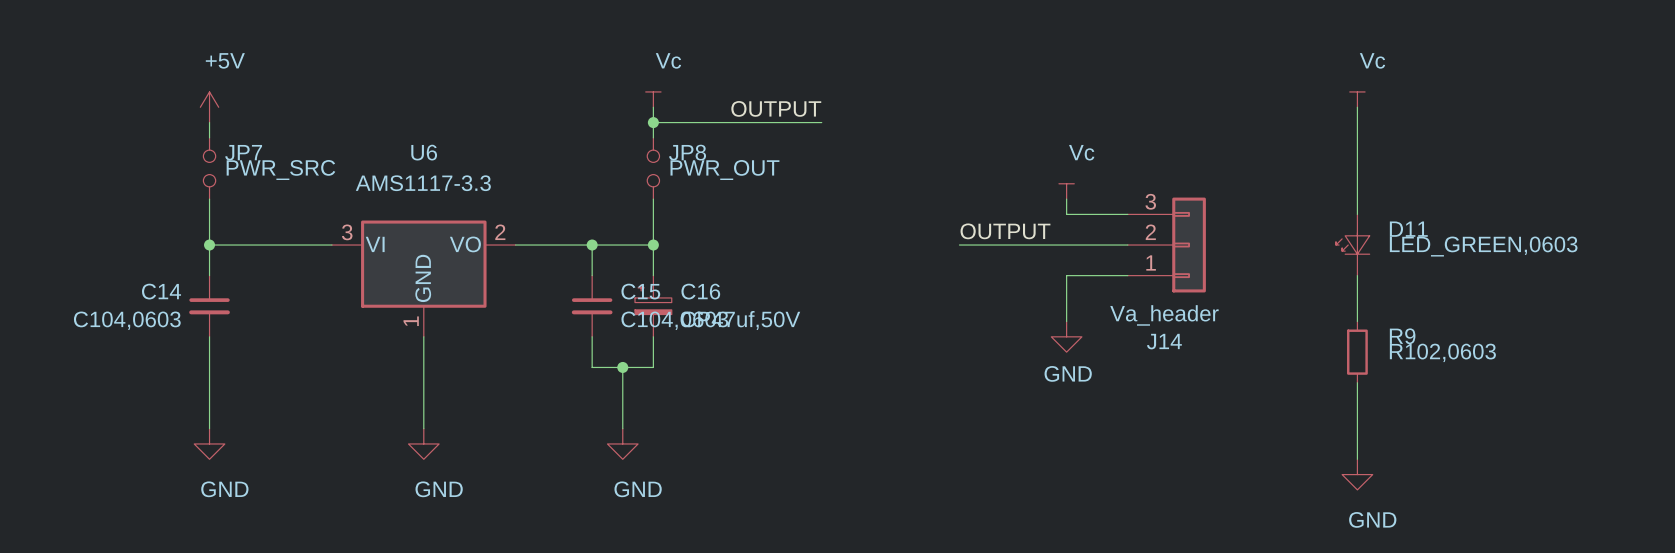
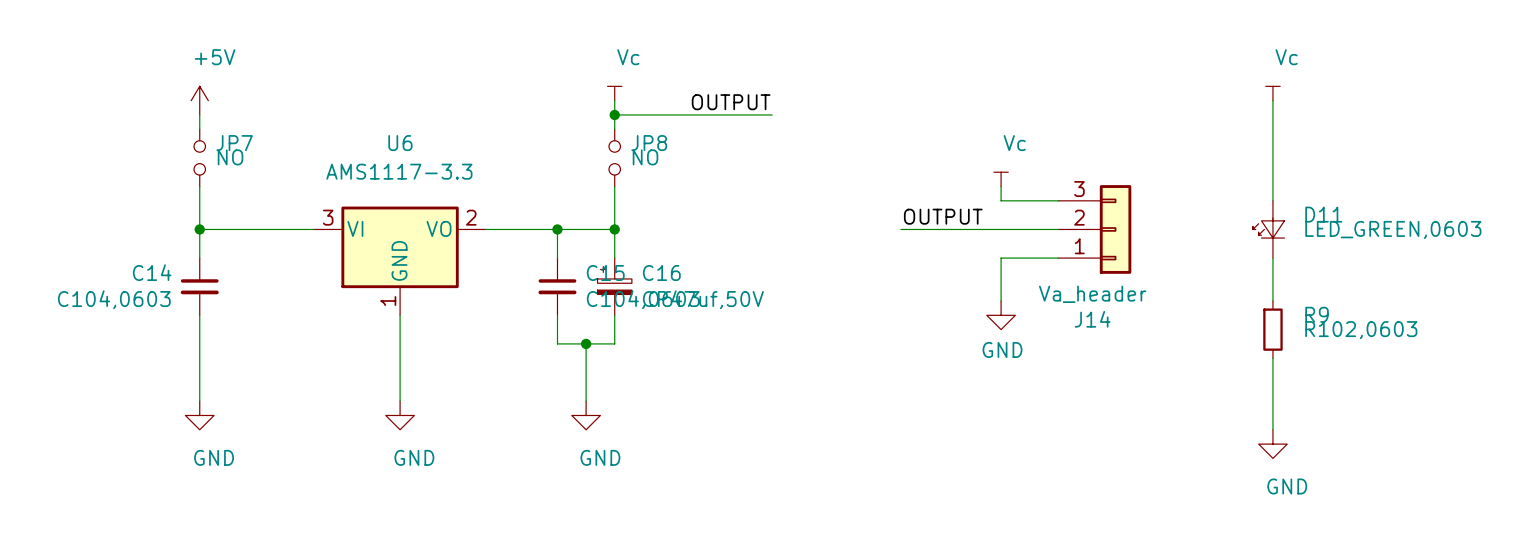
JP7 value: PWR_SRC (280, 170) -> NO (230, 157)
JP8 value: PWR_OUT (724, 170) -> NO (645, 157)

